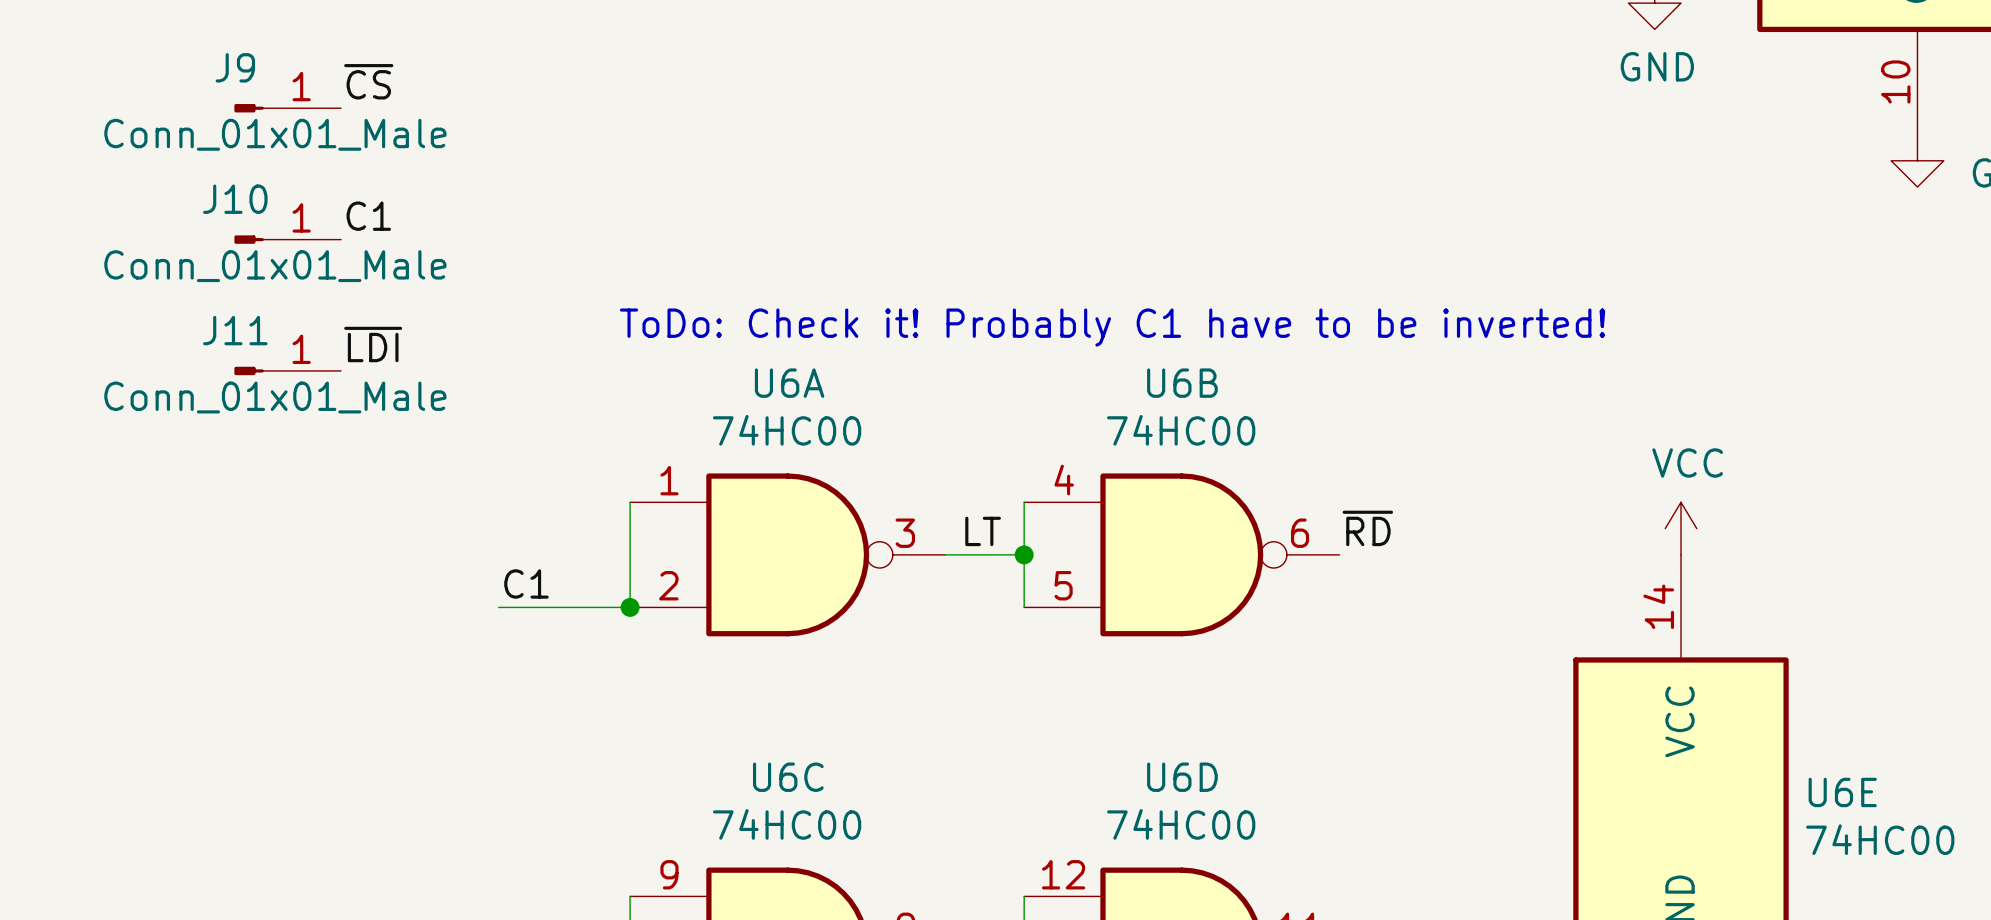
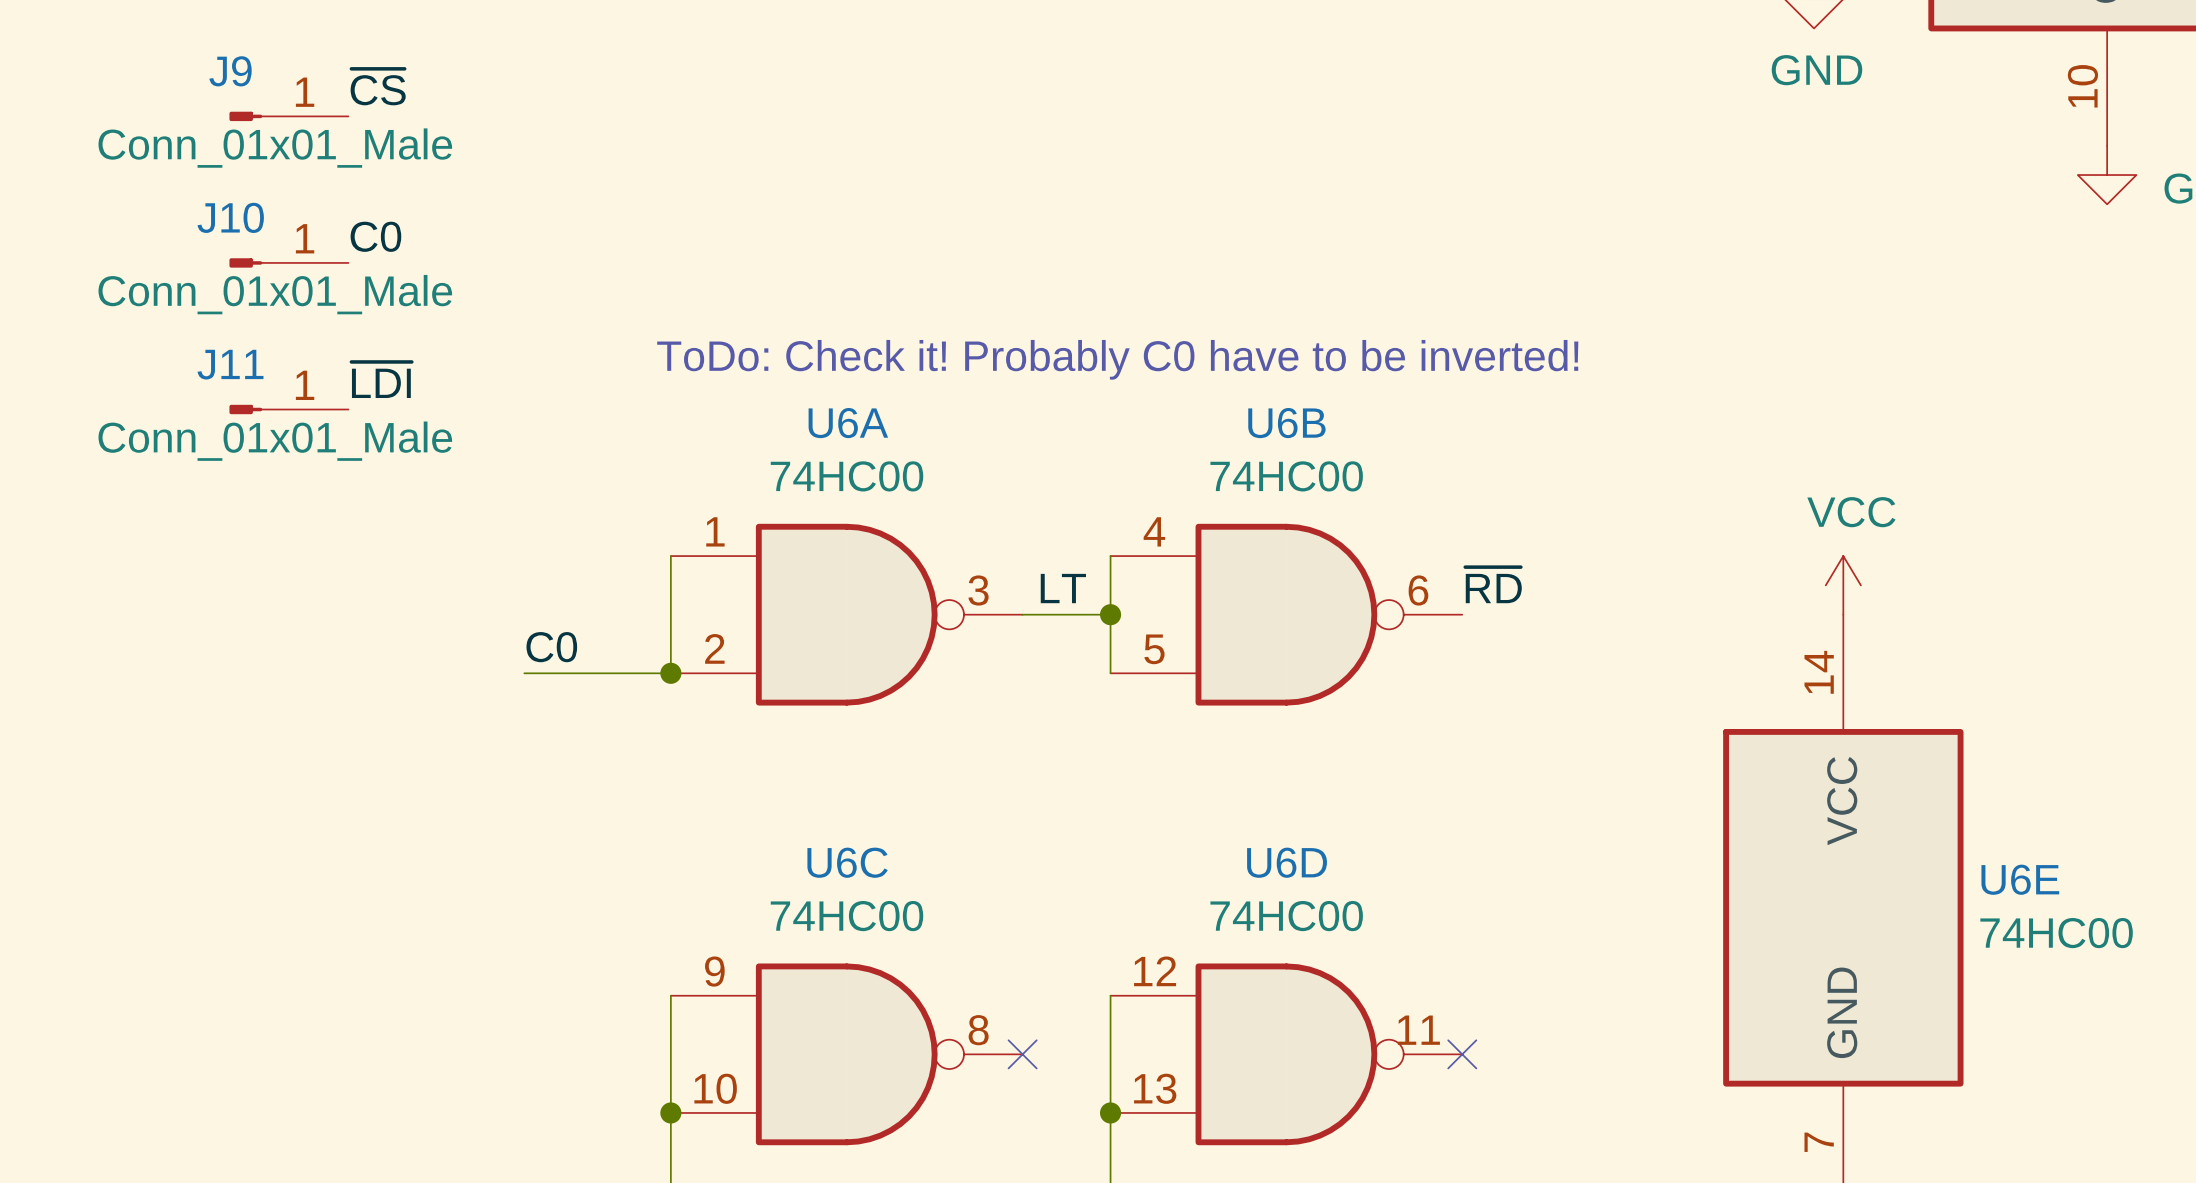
label: C1 (368, 216) -> C0 (375, 236)
text: ToDo: Check it! Probably C1 have to be inverted! (1112, 327) -> ToDo: Check it! Probably C0 have to be inverted! (1117, 359)
label: C1 (526, 583) -> C0 (551, 647)

